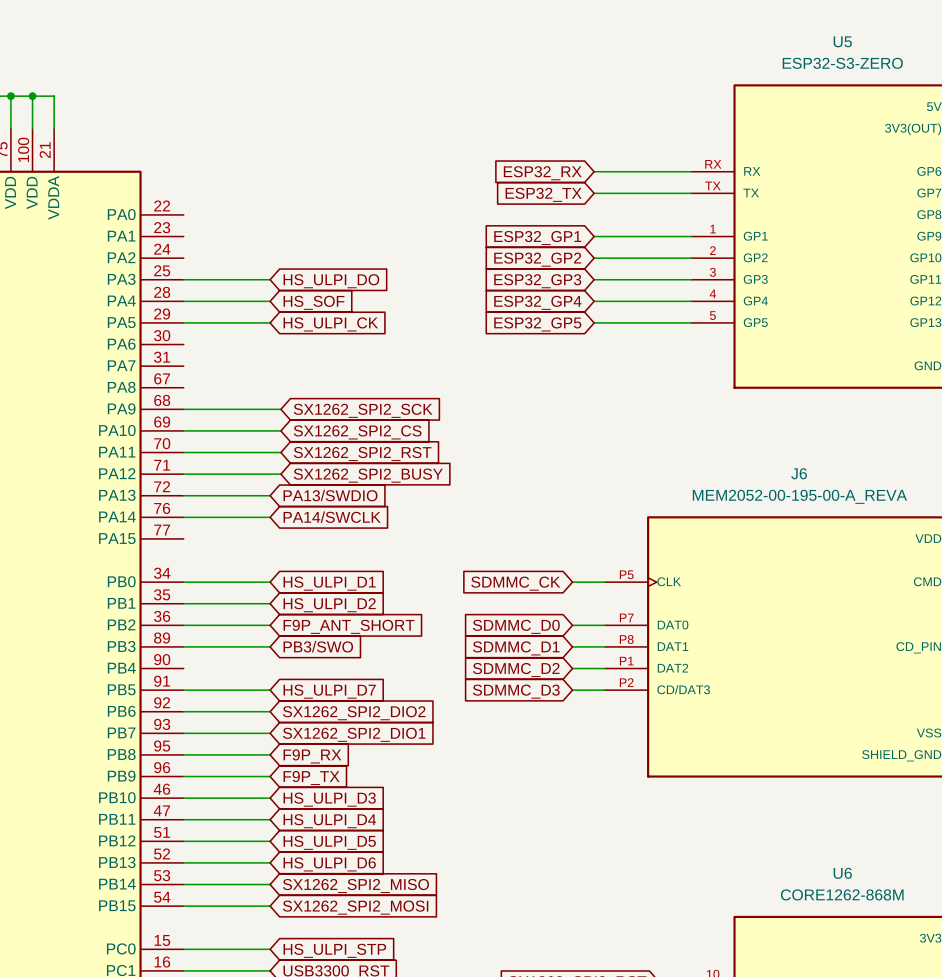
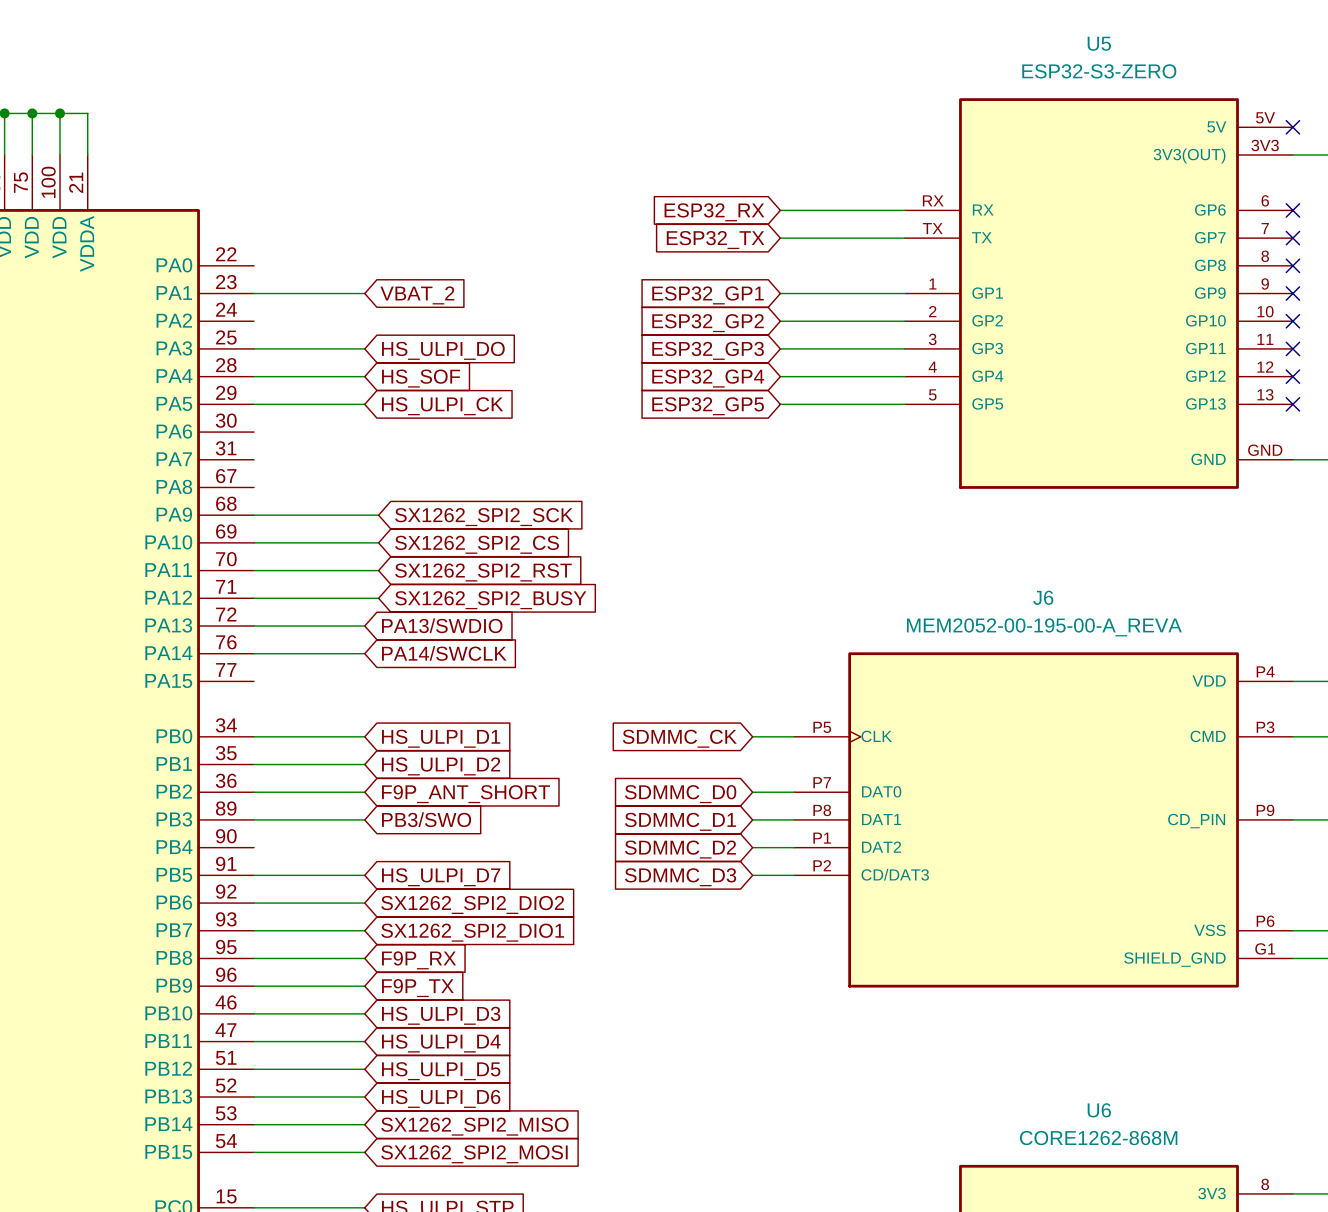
wire: none -> (253, 293) (364, 293)
global label: none -> VBAT_2 (417, 295)

